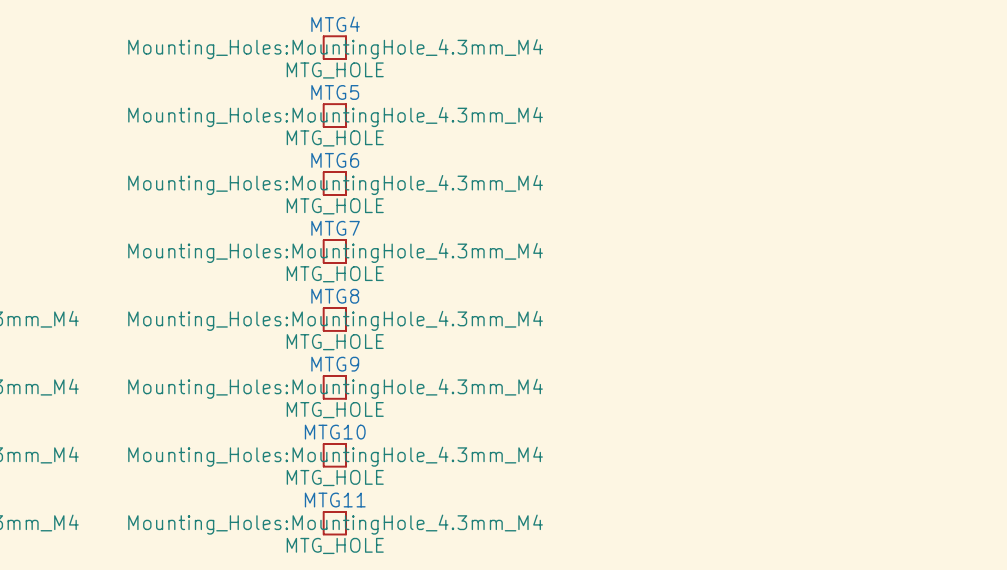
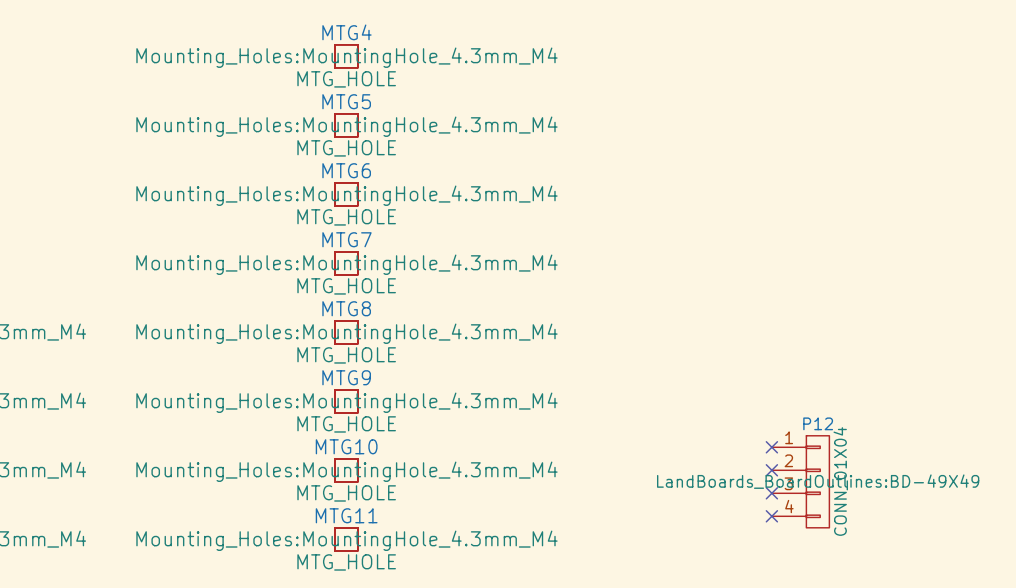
no-connect mark: none -> (771, 447)
no-connect mark: none -> (771, 470)
P12: none -> CONN_01X04 (800, 481)
no-connect mark: none -> (771, 493)
no-connect mark: none -> (771, 516)

